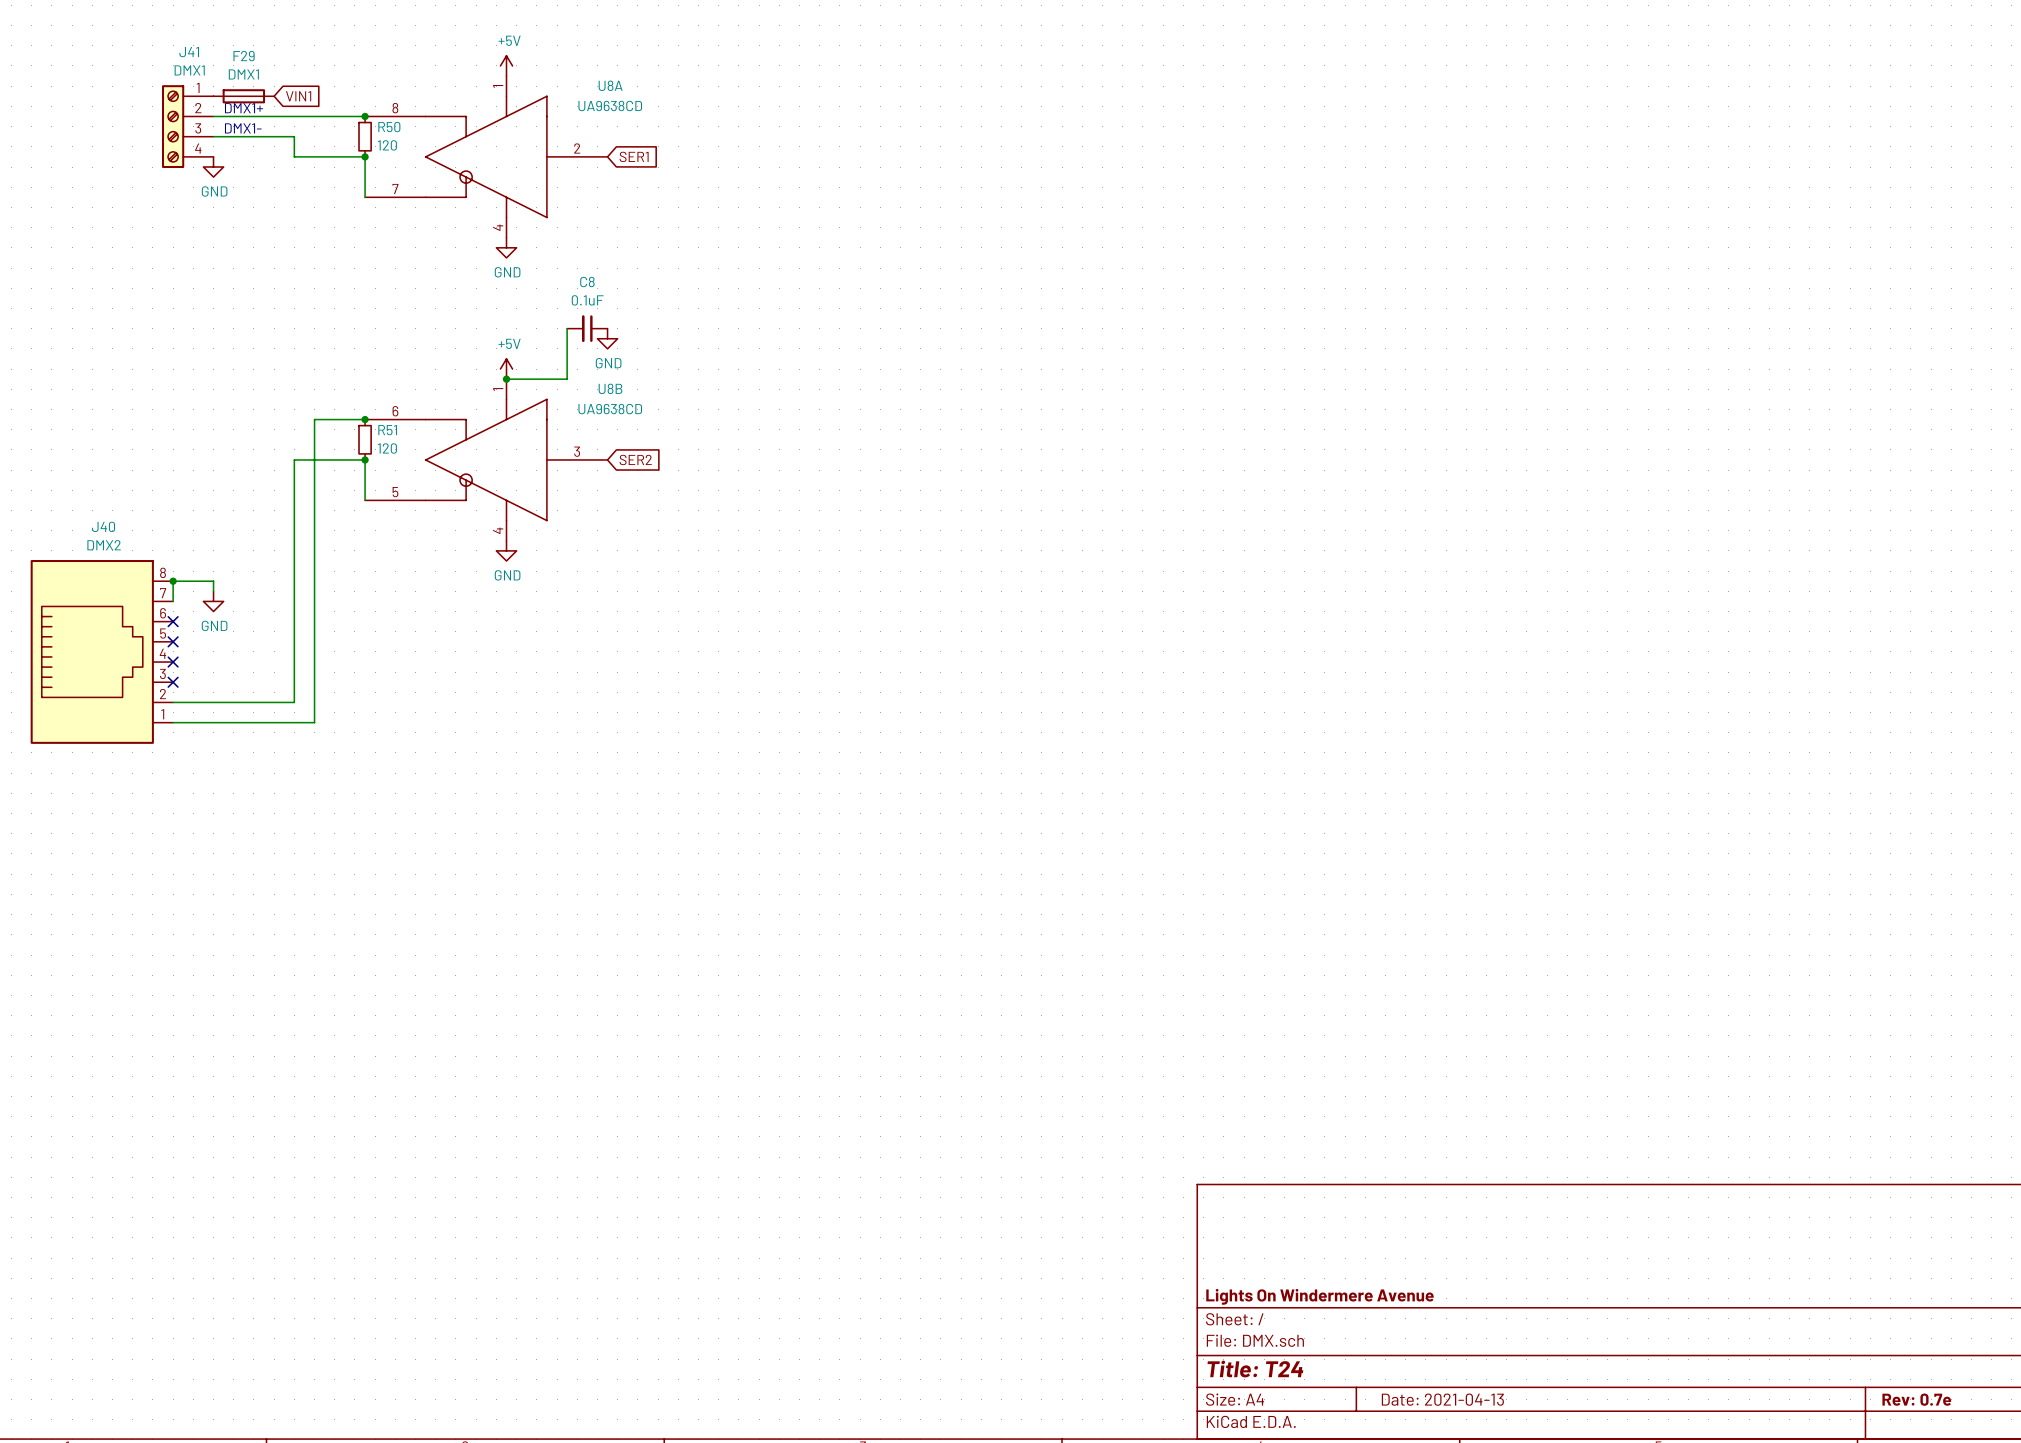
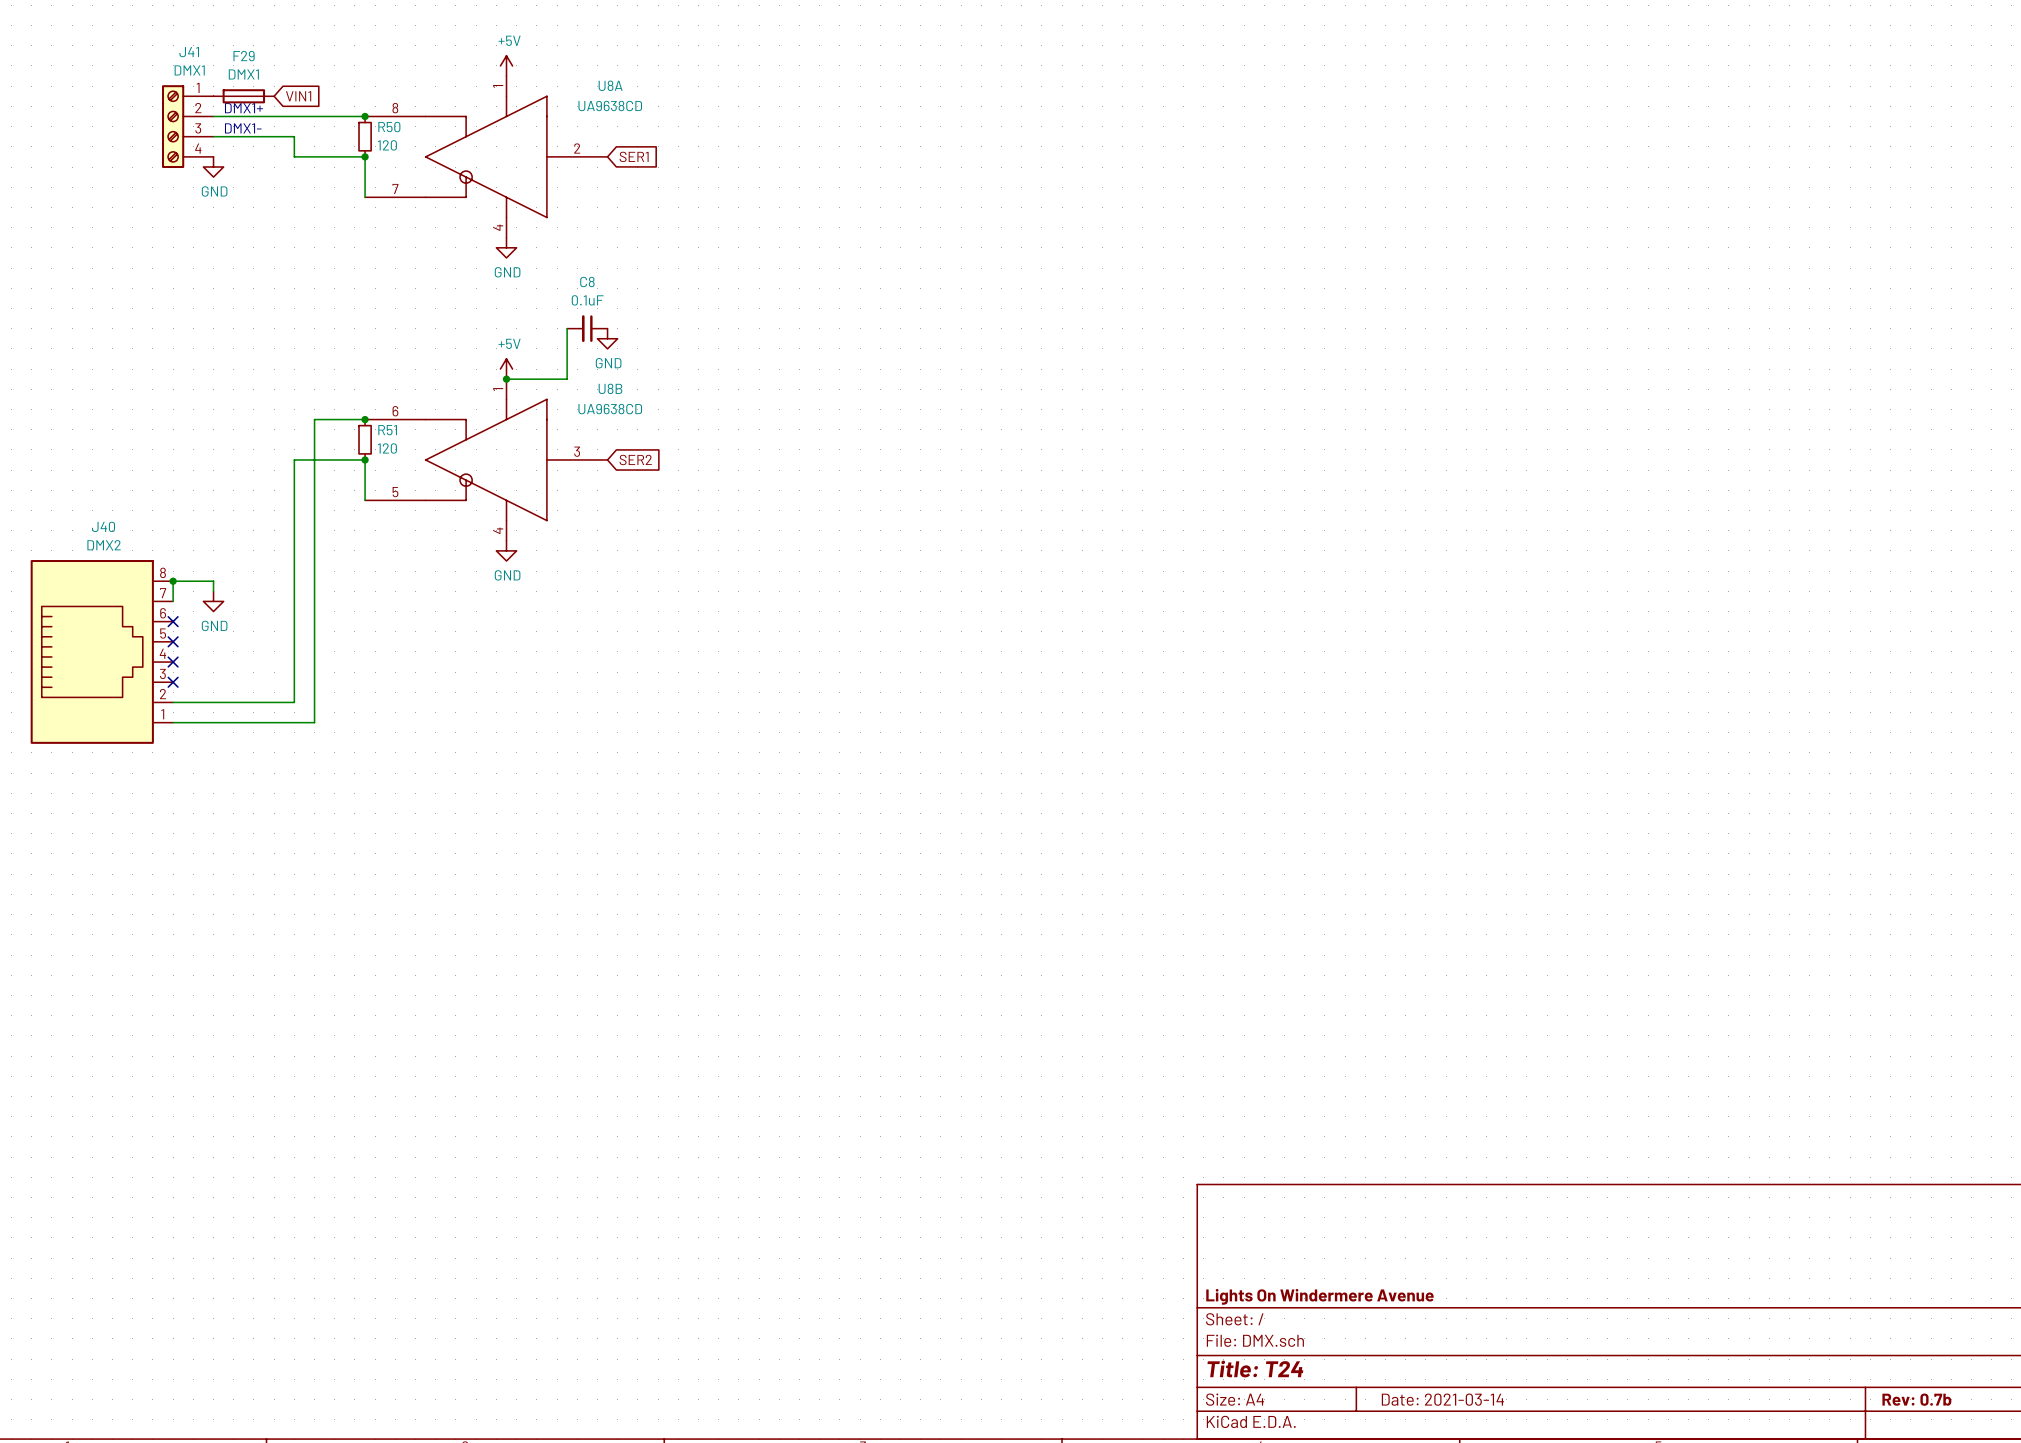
title block: Date: 2021-04-13 (1442, 1399) -> Date: 2021-03-14 (1442, 1399)
title block: Rev: 0.7e (1916, 1399) -> Rev: 0.7b (1916, 1399)

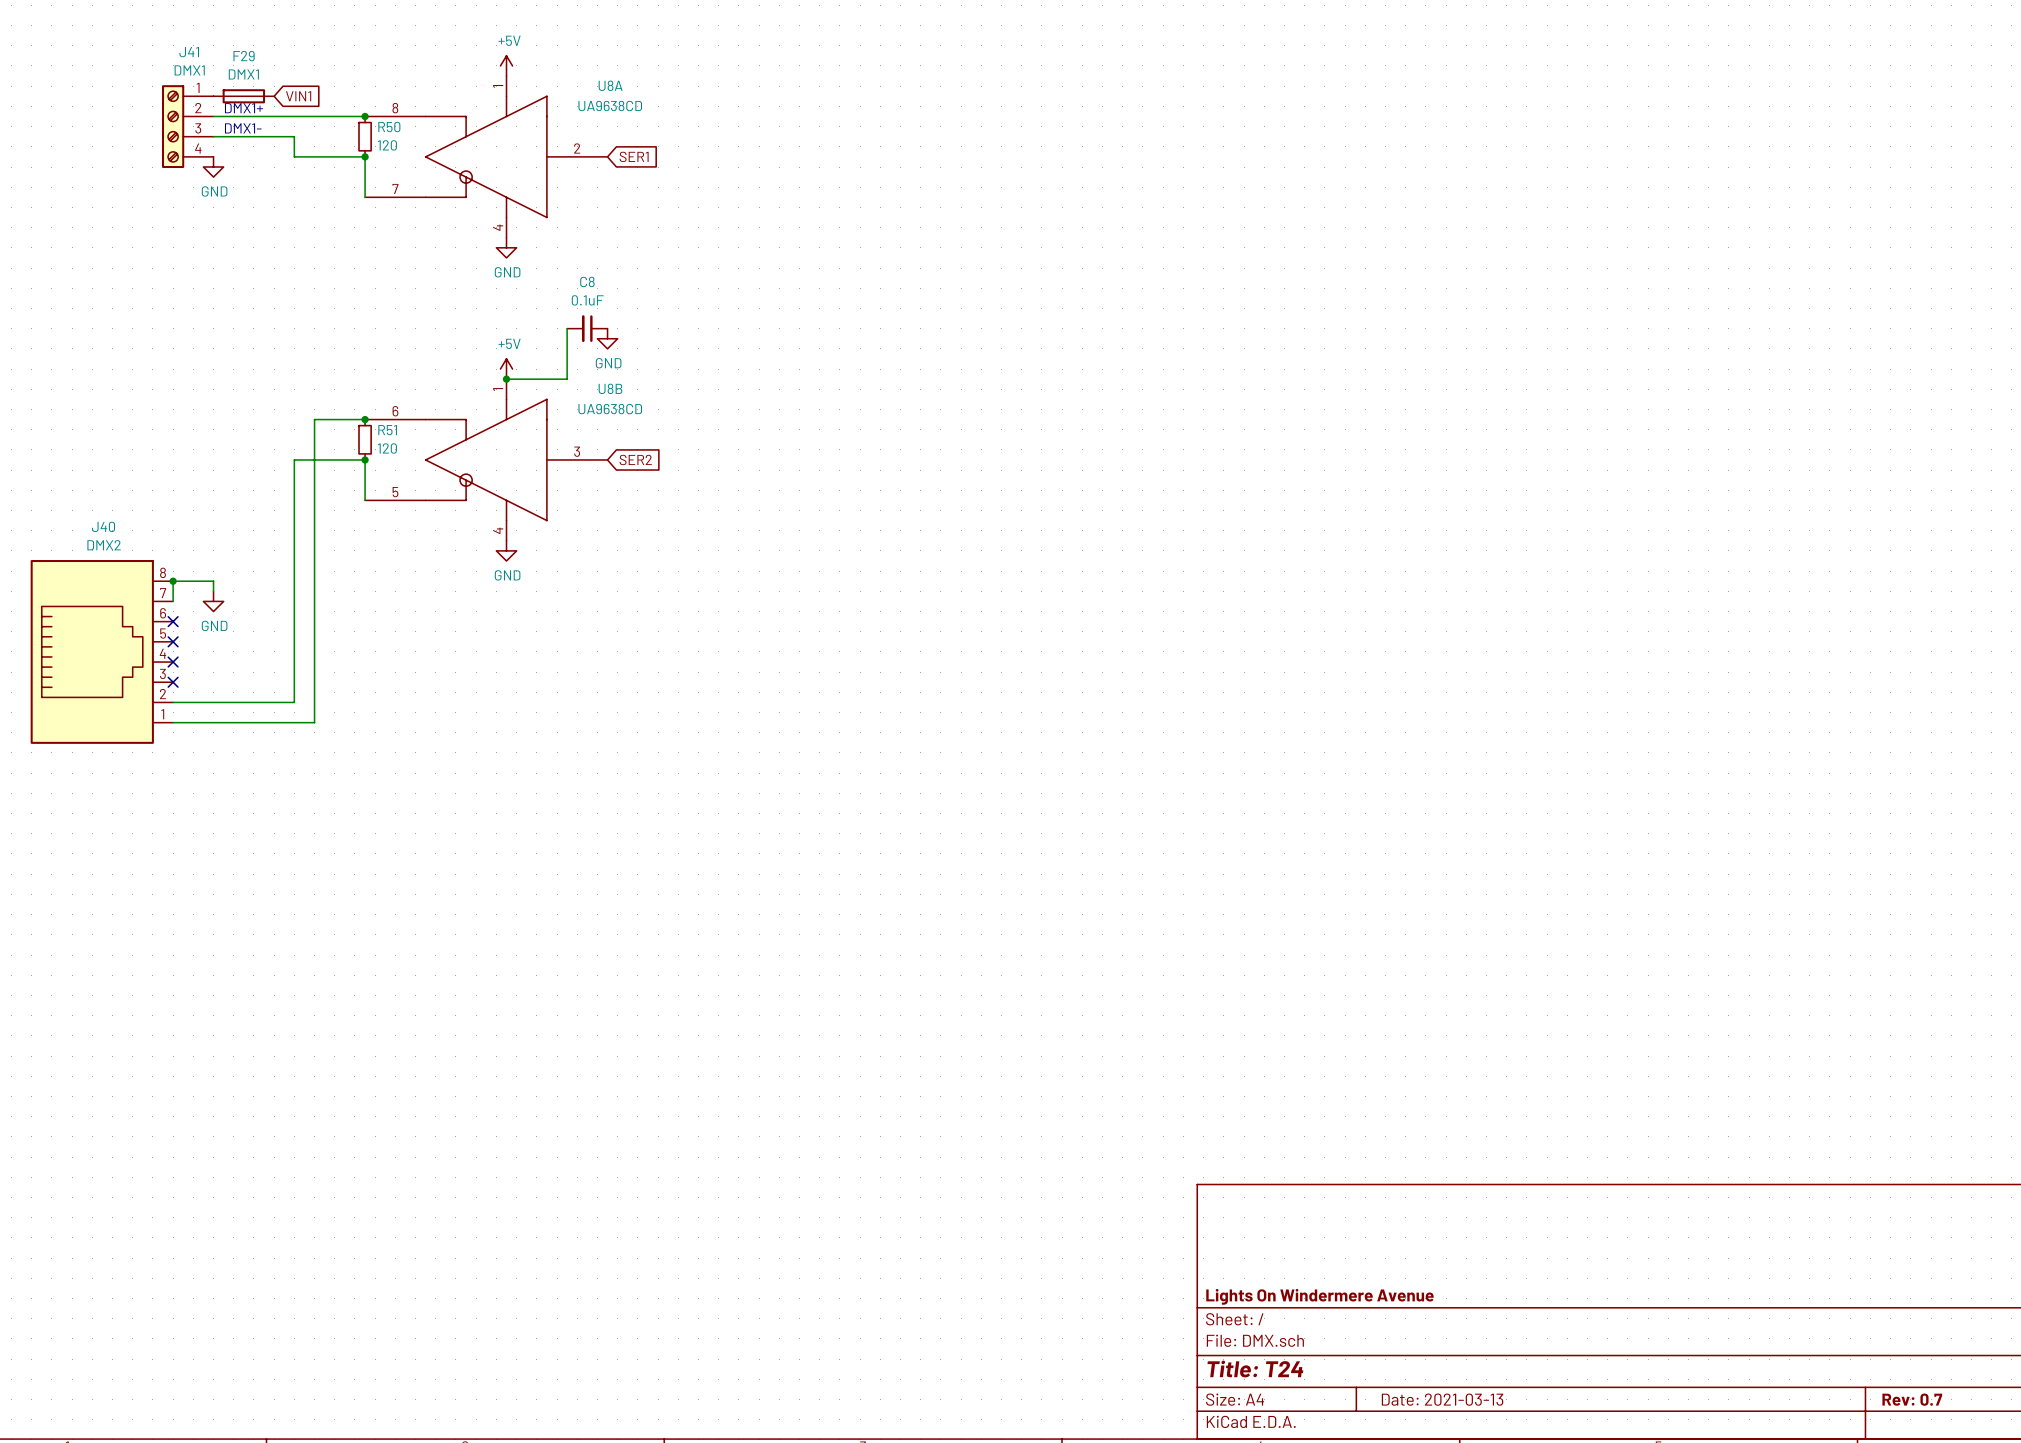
title block: Date: 2021-03-14 (1442, 1399) -> Date: 2021-03-13 (1442, 1399)
title block: Rev: 0.7b (1916, 1399) -> Rev: 0.7 (1912, 1399)

